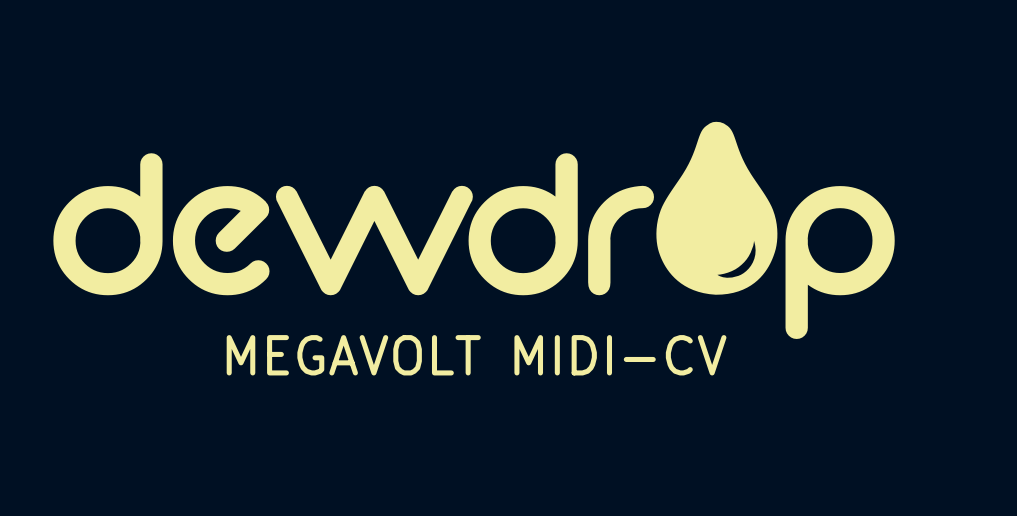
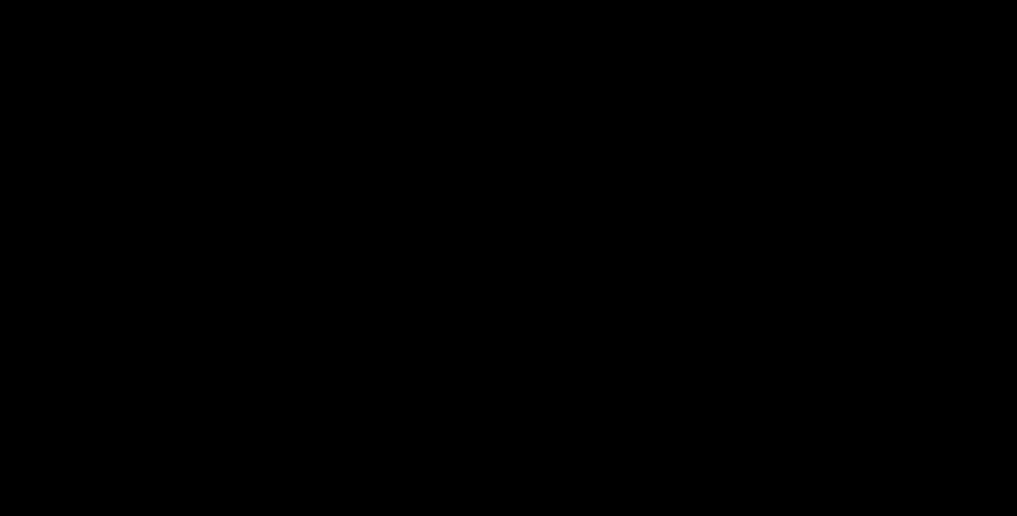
drawing: [53, 121, 895, 339] -> none
text: MEGAVOLT MIDI-CV (476, 355) -> none

